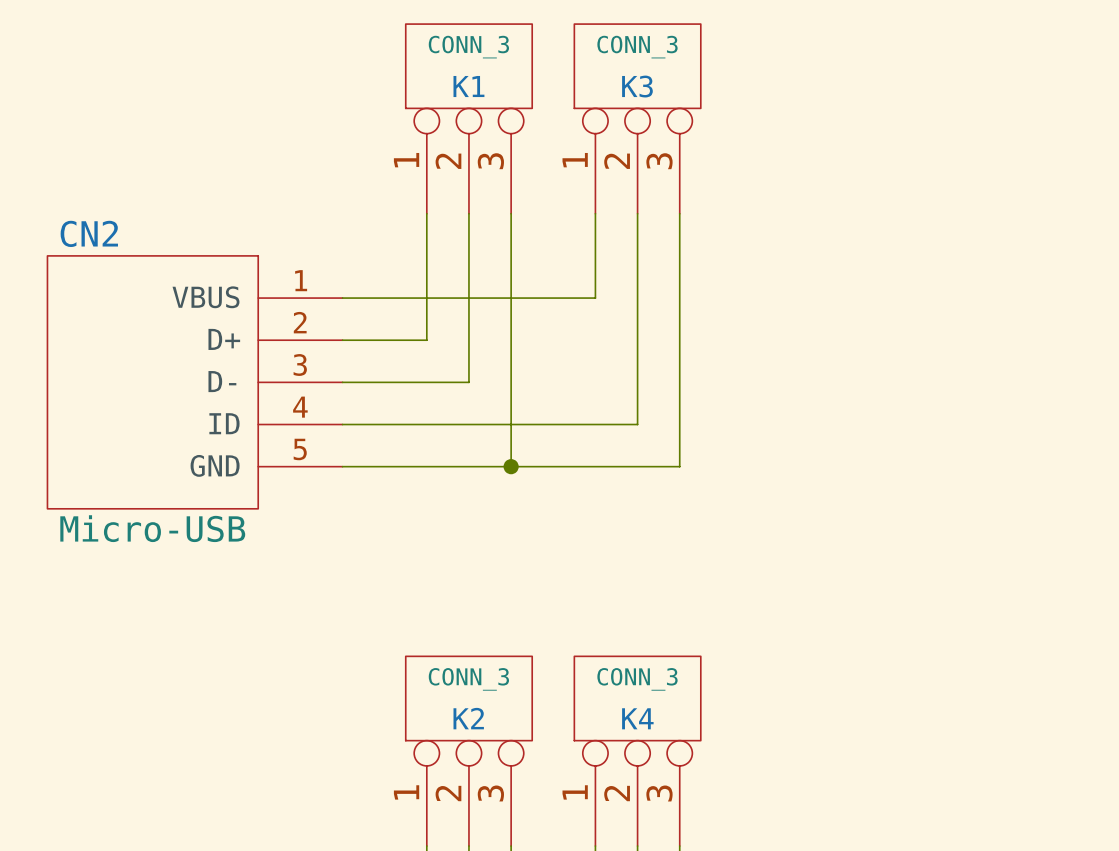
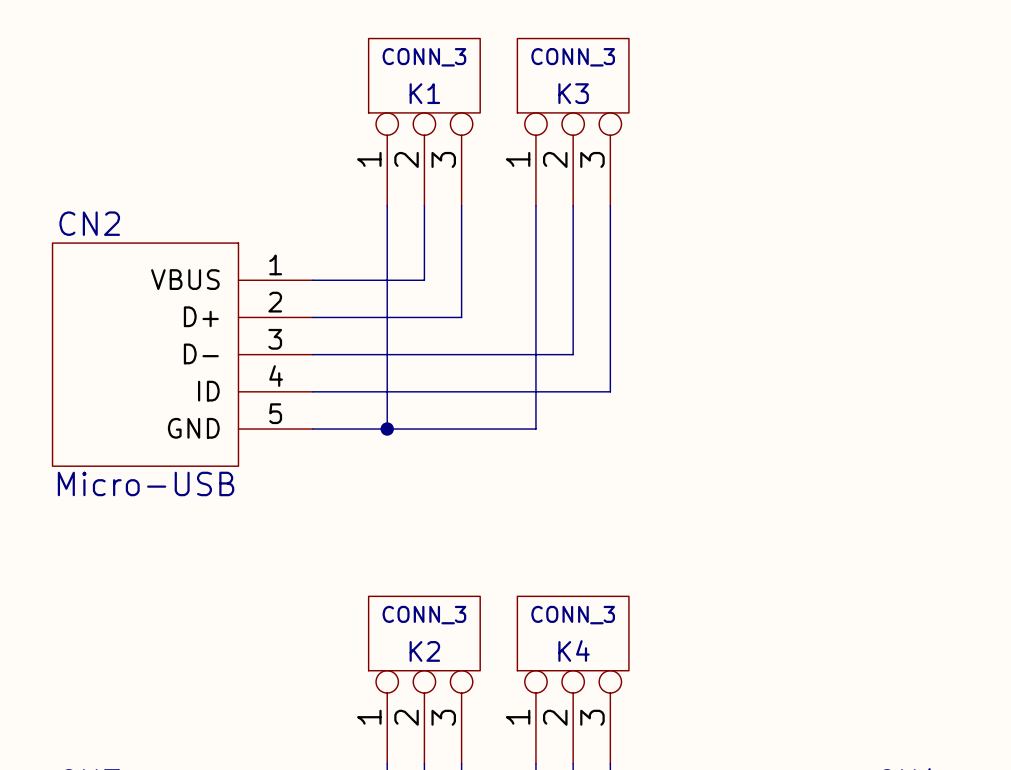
wire: (595, 298) (468, 298) (468, 382) -> (573, 354) (424, 354)
wire: none -> (535, 280) (535, 429)
wire: (511, 340) (511, 466) -> (461, 317) (387, 317) (387, 429)
wire: (637, 382) (637, 424) -> none
wire: (679, 424) (679, 466) (595, 466) -> (610, 391) (573, 391)
junction position: (511, 466) -> (387, 429)

